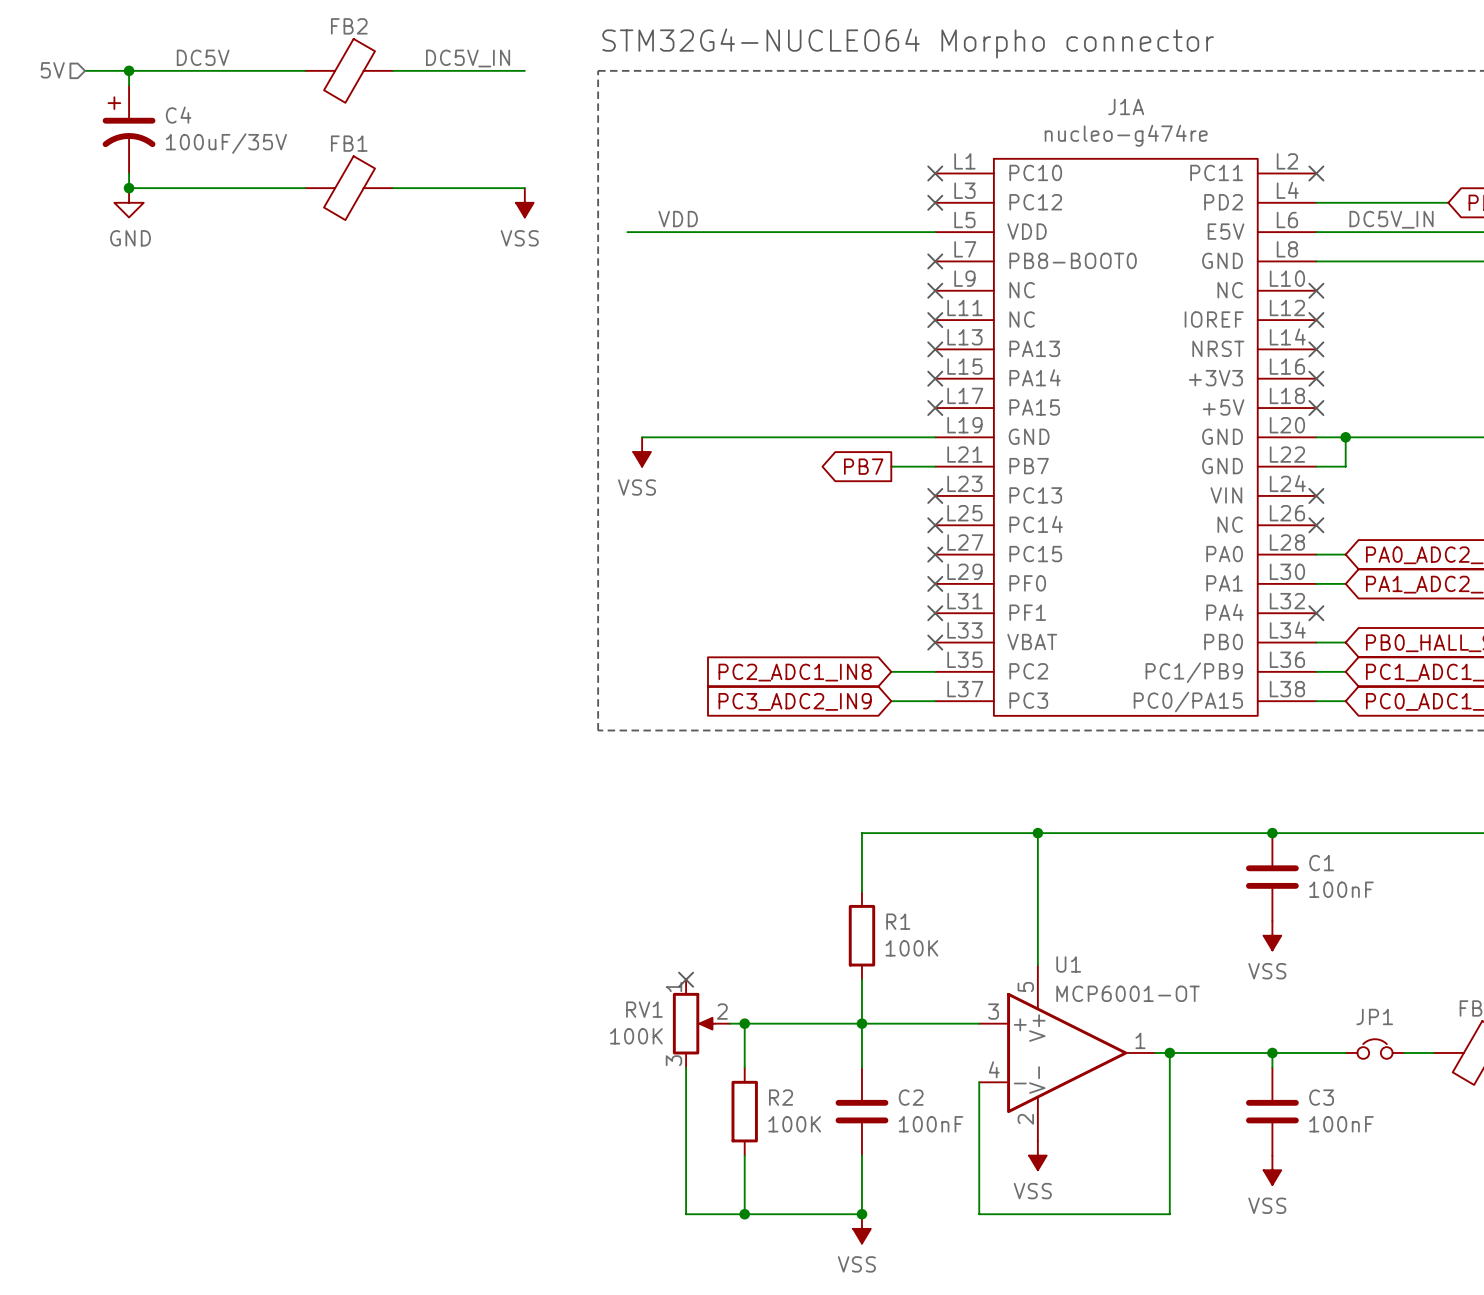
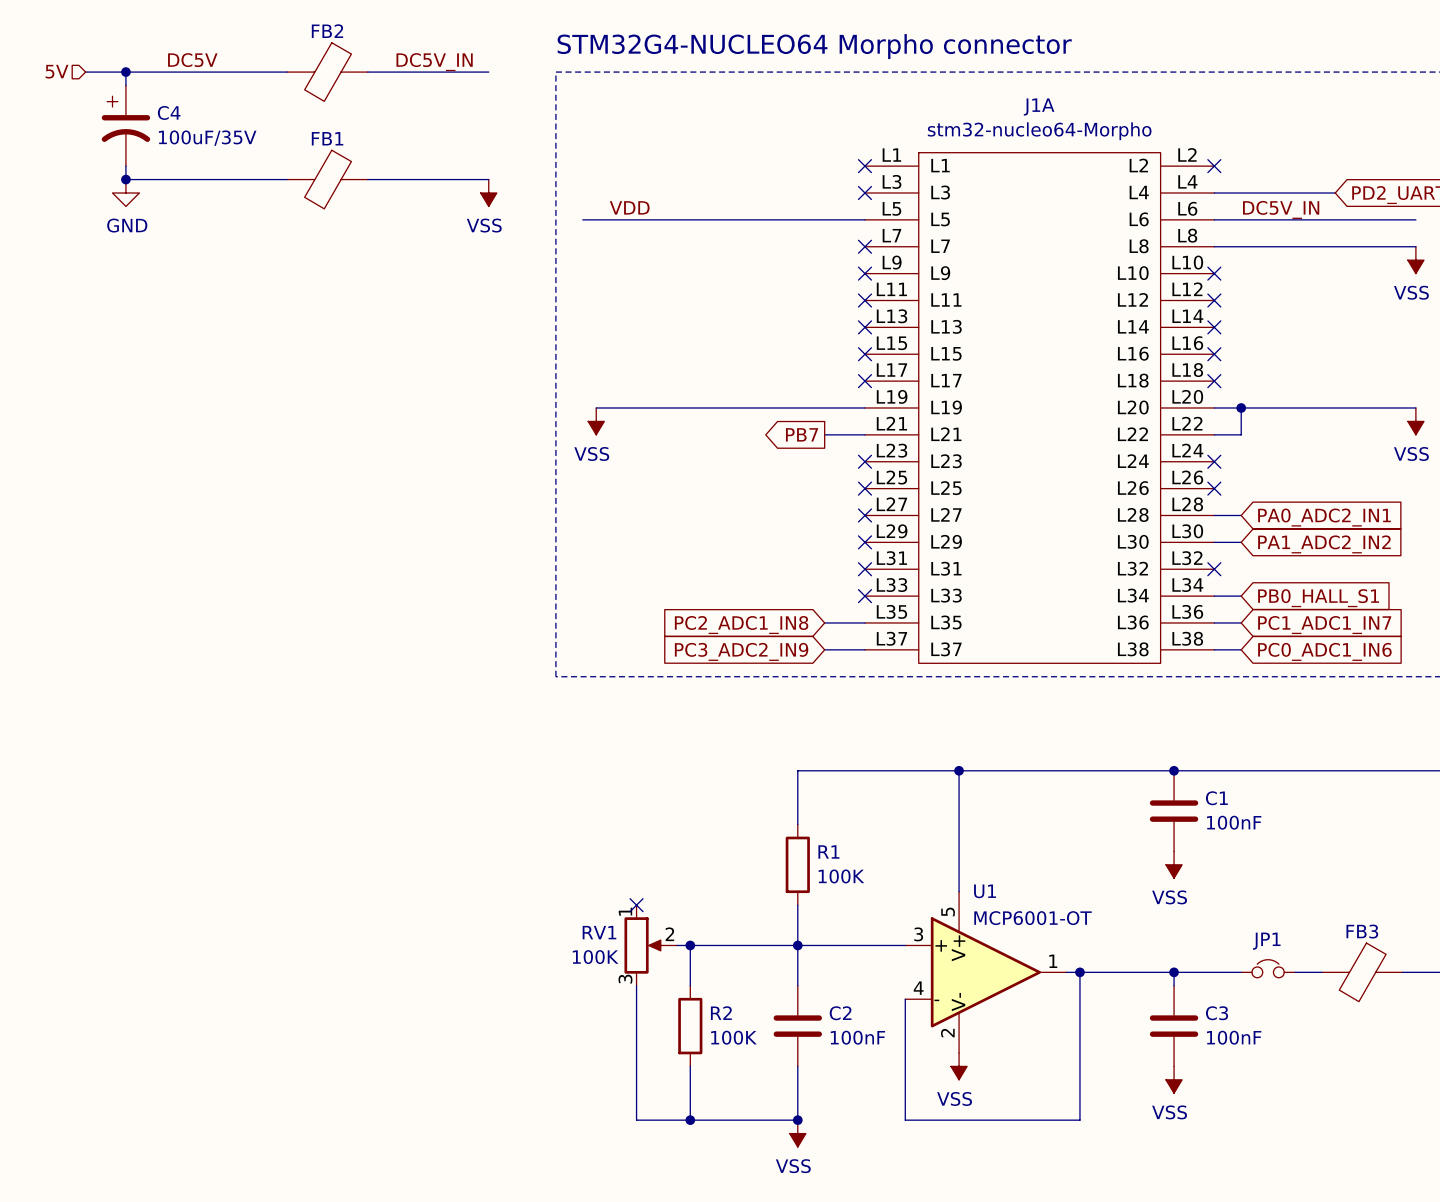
J1A value: nucleo-g474re (1126, 135) -> stm32-nucleo64-Morpho (1039, 131)
J1A symbol: [935, 158, 1317, 716] -> [864, 152, 1215, 664]

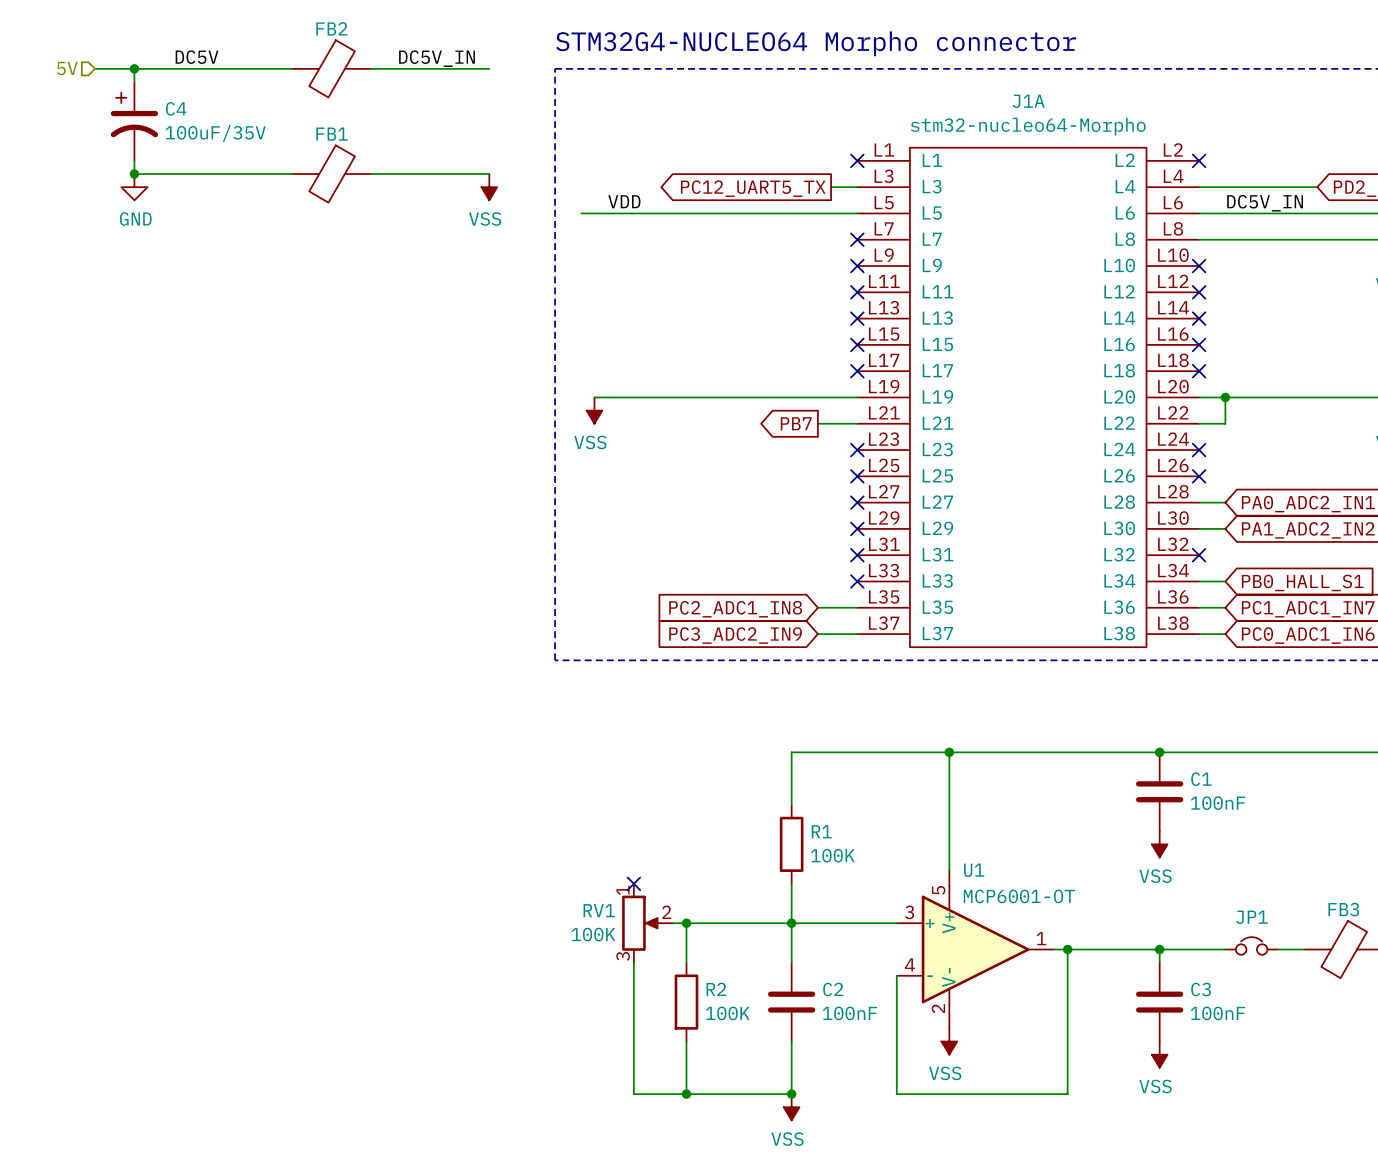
wire: none -> (831, 187) (857, 187)
no-connect mark: (864, 193) -> none
global label: none -> PC12_UART5_TX (753, 188)

